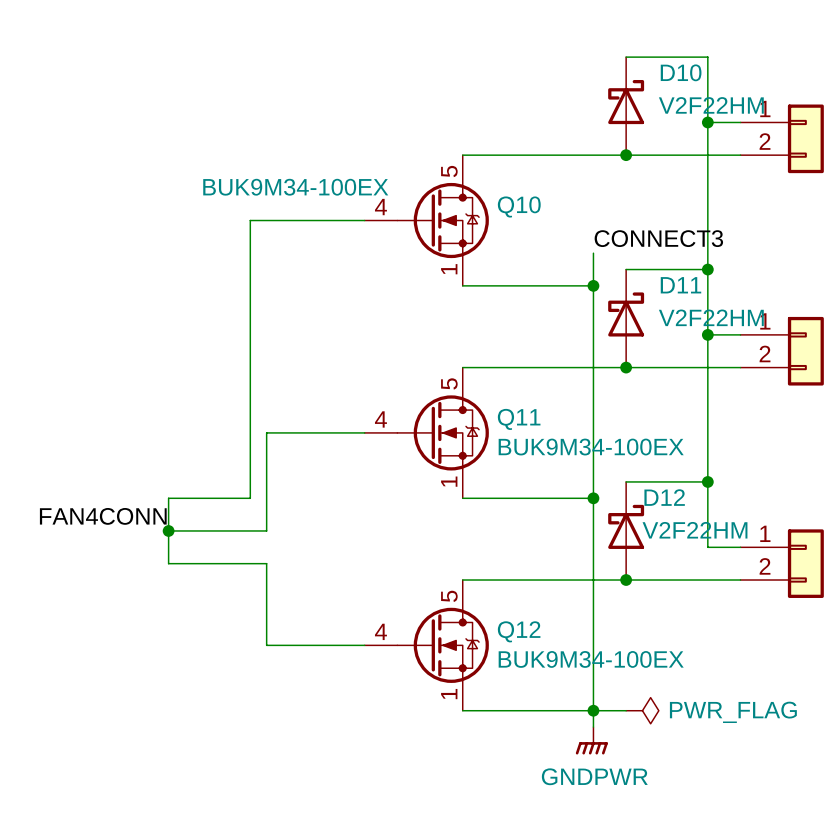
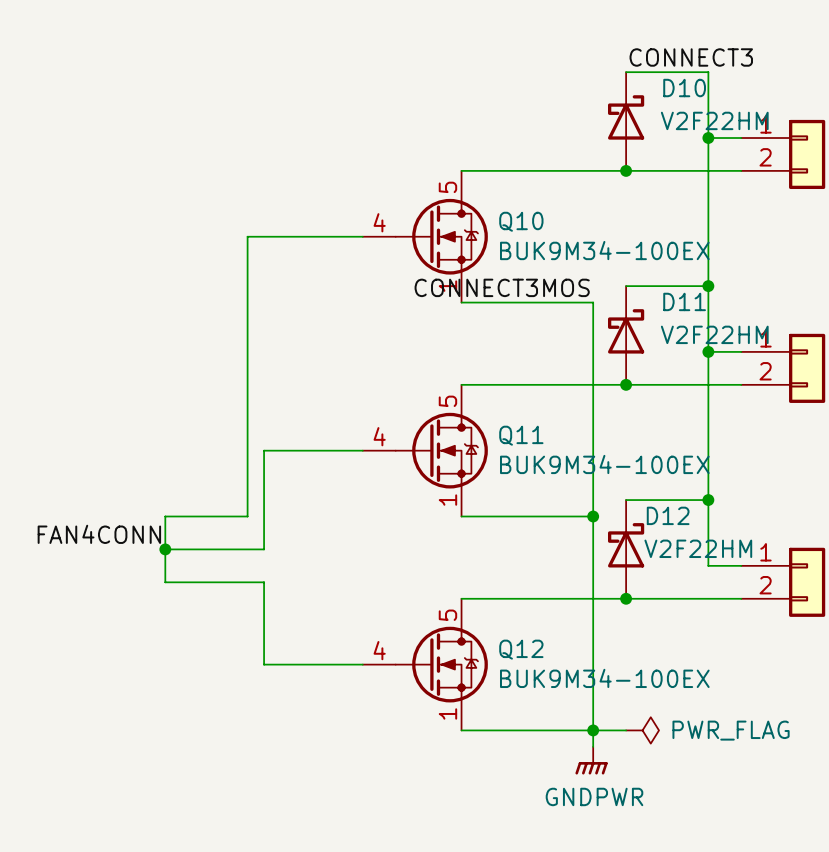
Q10 value position: BUK9M34-100EX (295, 187) -> BUK9M34-100EX (604, 250)
label position: CONNECT3 (658, 238) -> CONNECT3 (691, 57)
wire: (593, 253) (593, 285) -> none
label: none -> CONNECT3MOS (502, 287)
junction: (593, 285) -> none

